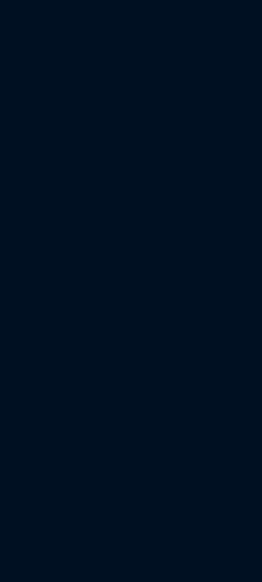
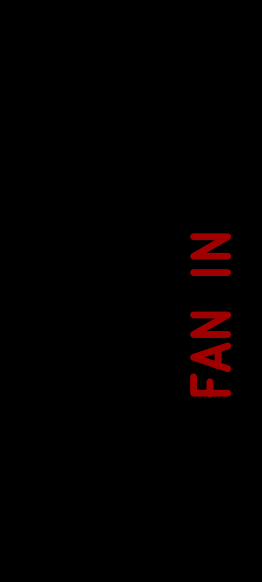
text: none -> FAN IN (210, 314)

